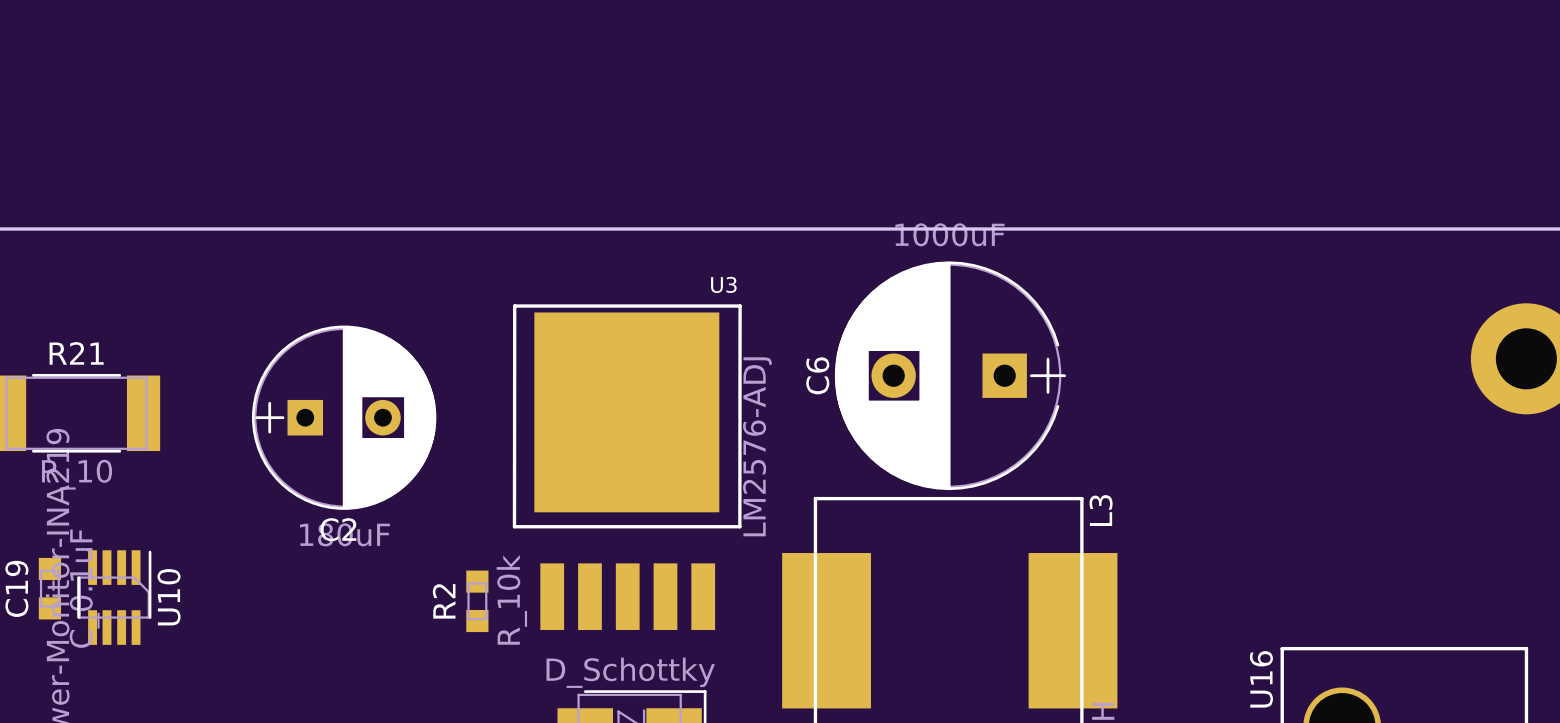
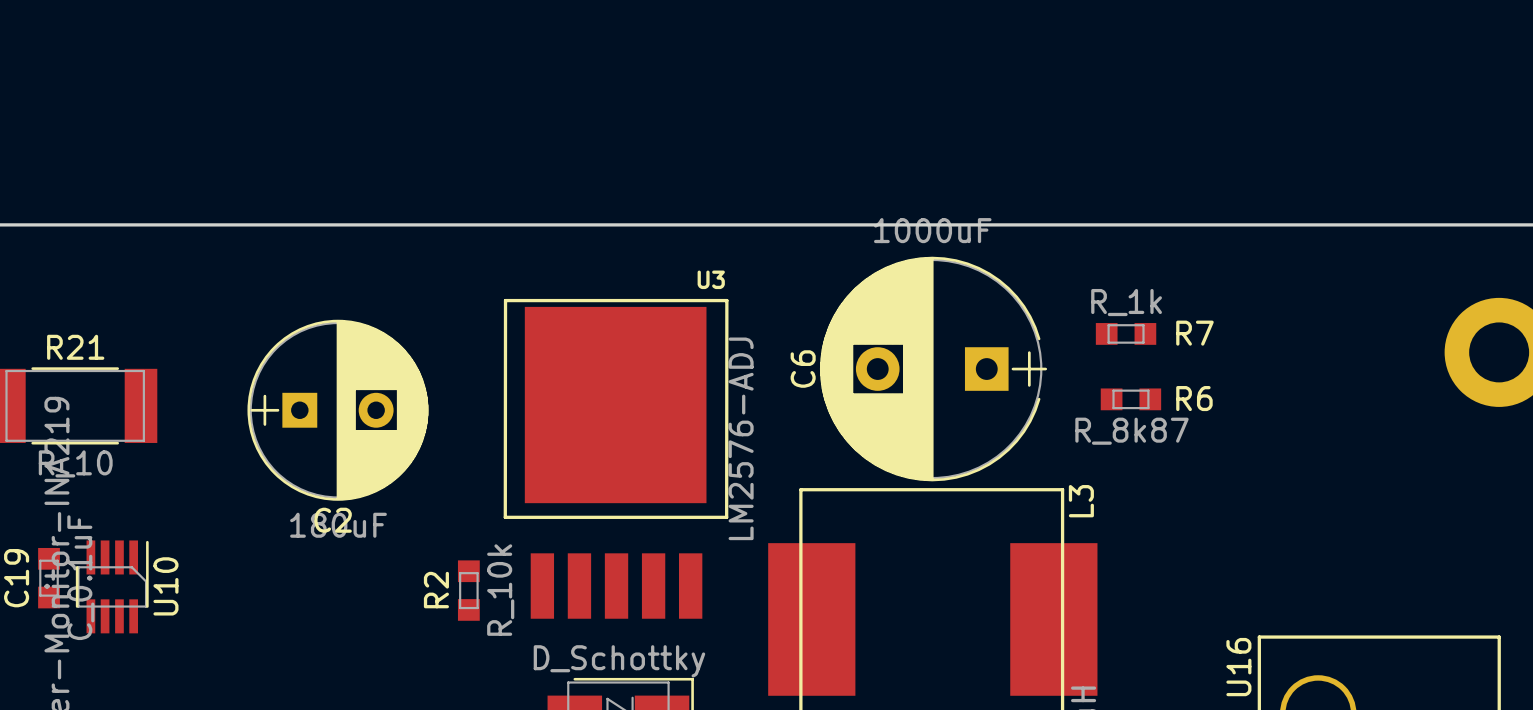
R7: none -> R_1k (1126, 333)
R6: none -> R_8k87 (1130, 399)

